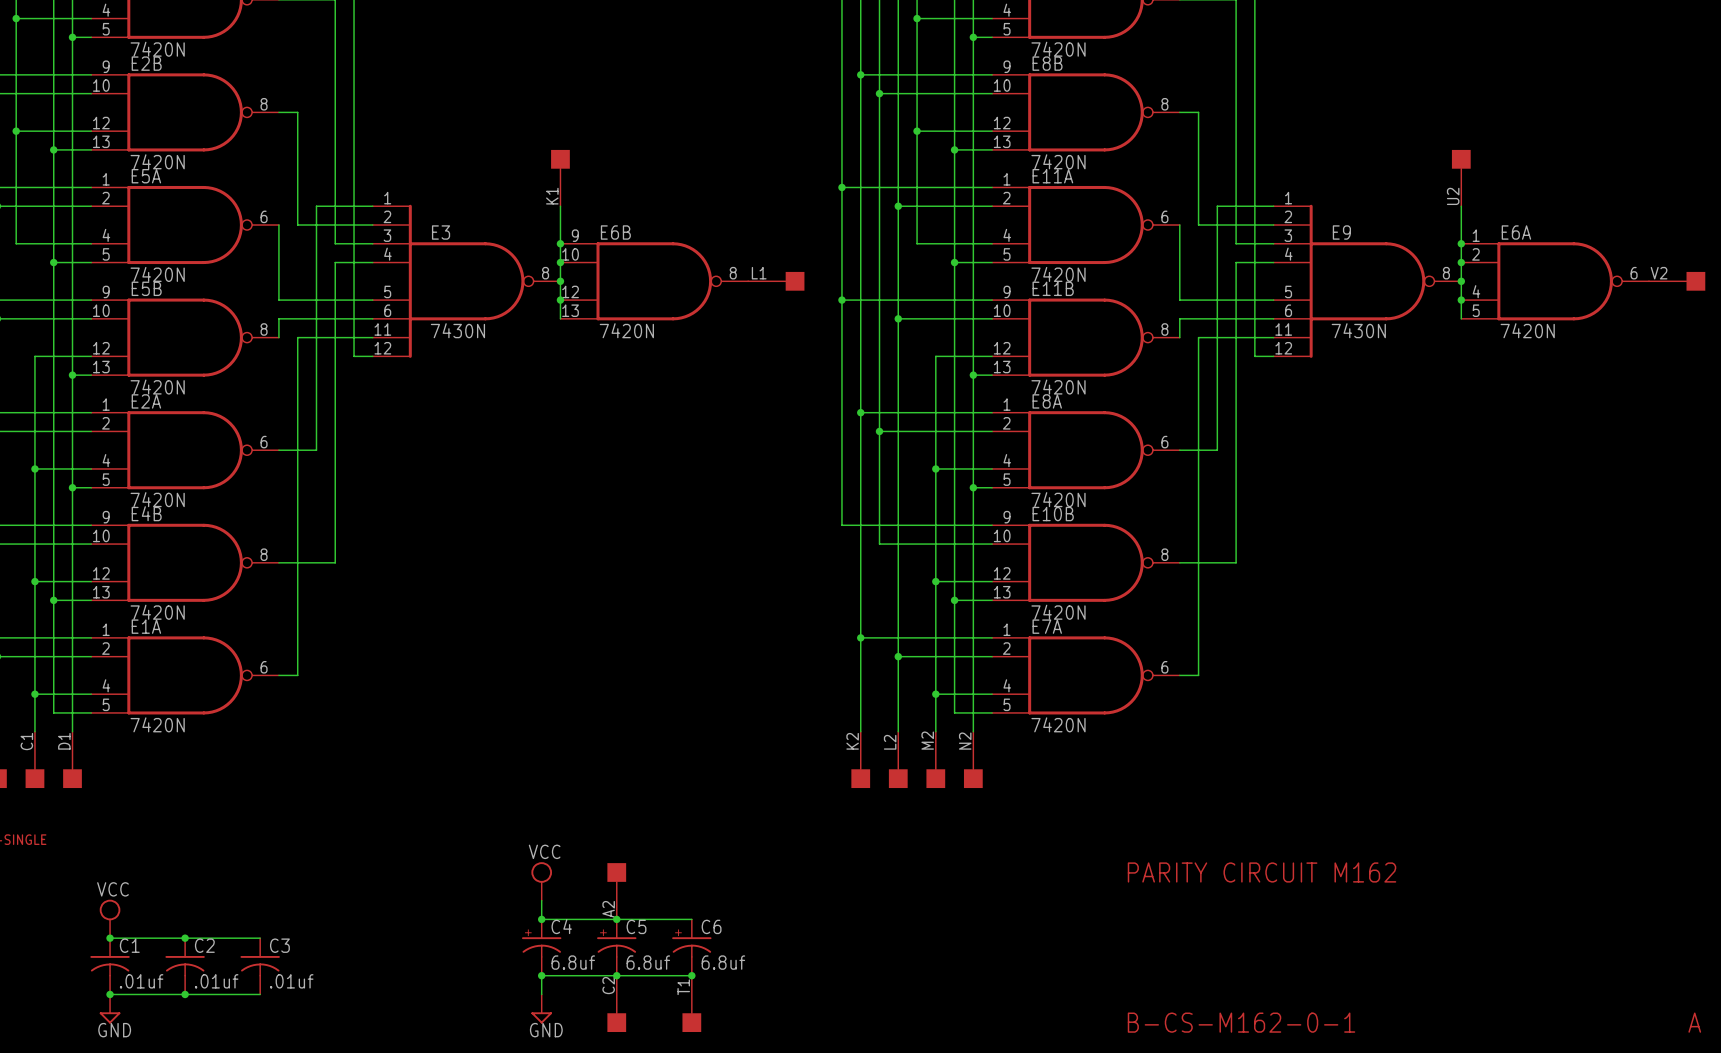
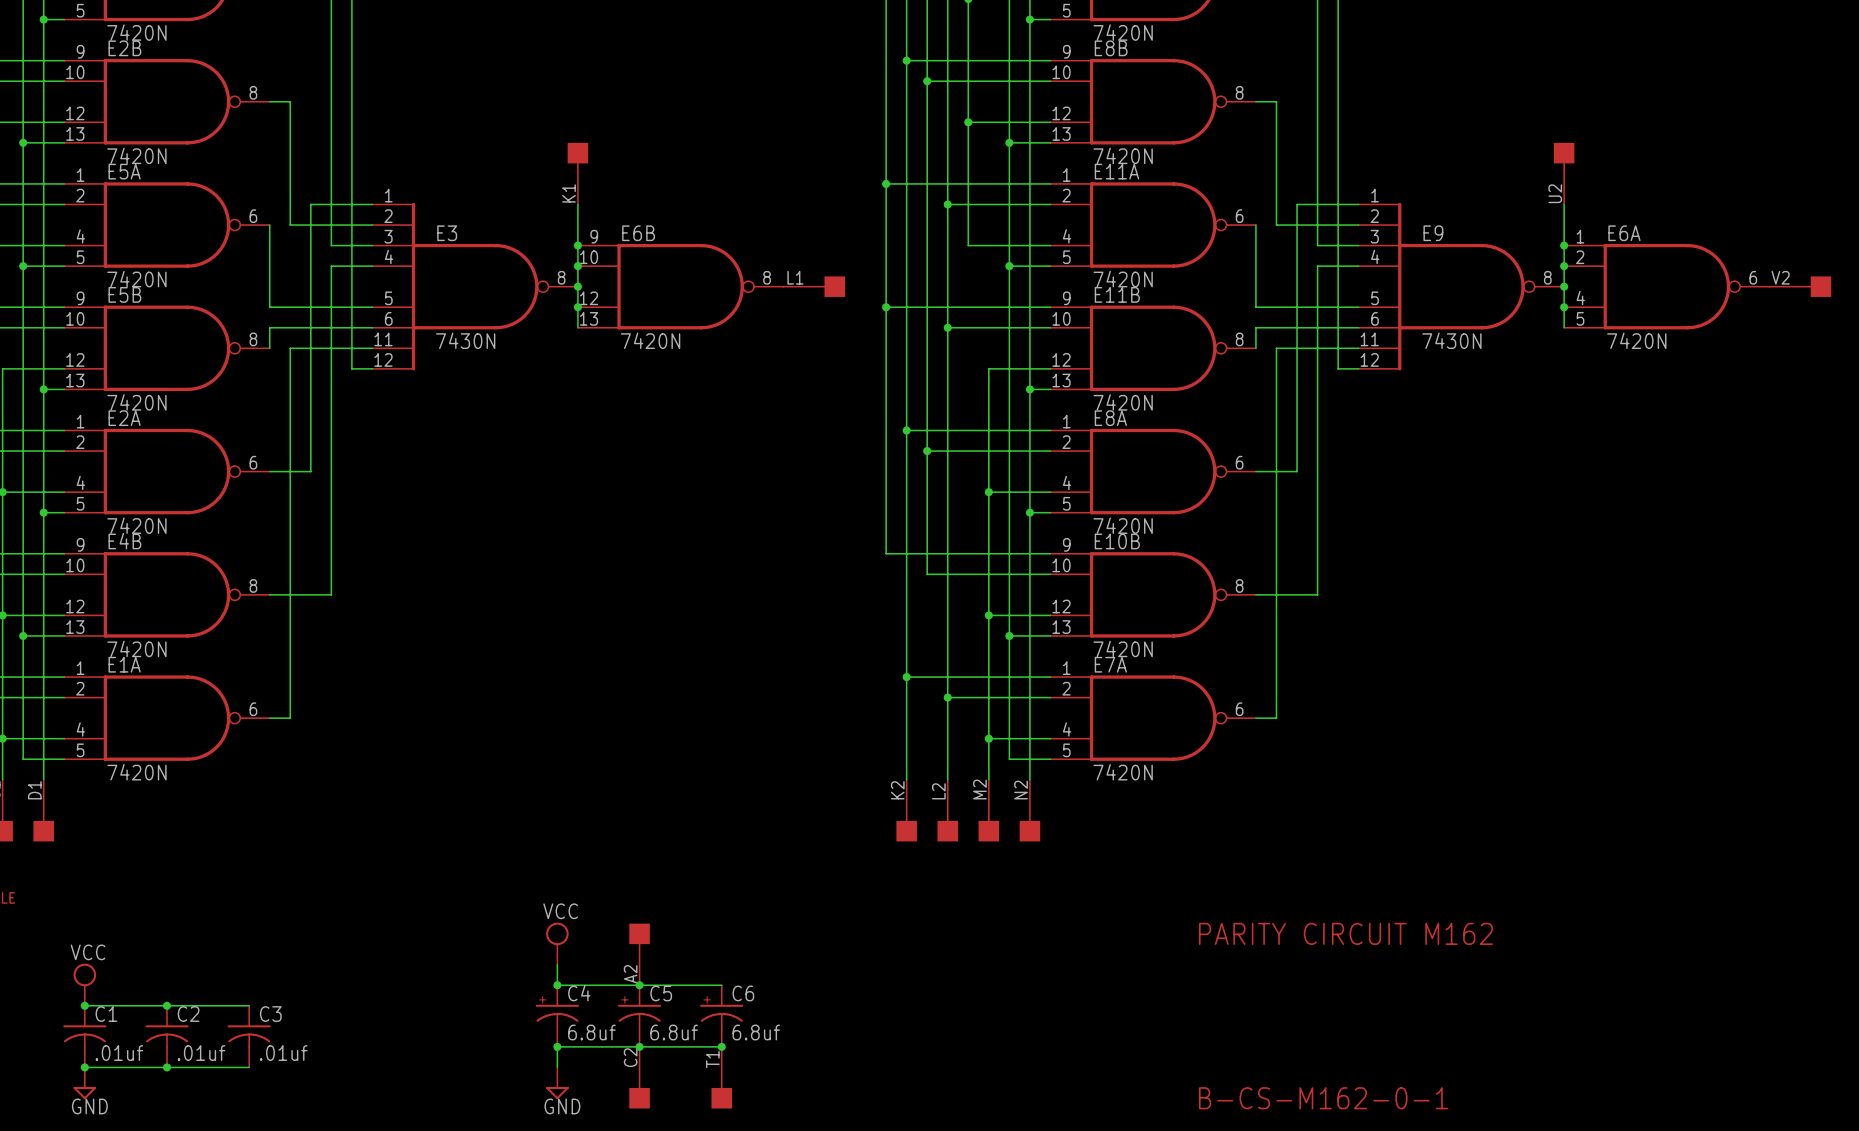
text: A (1694, 1022) -> none

